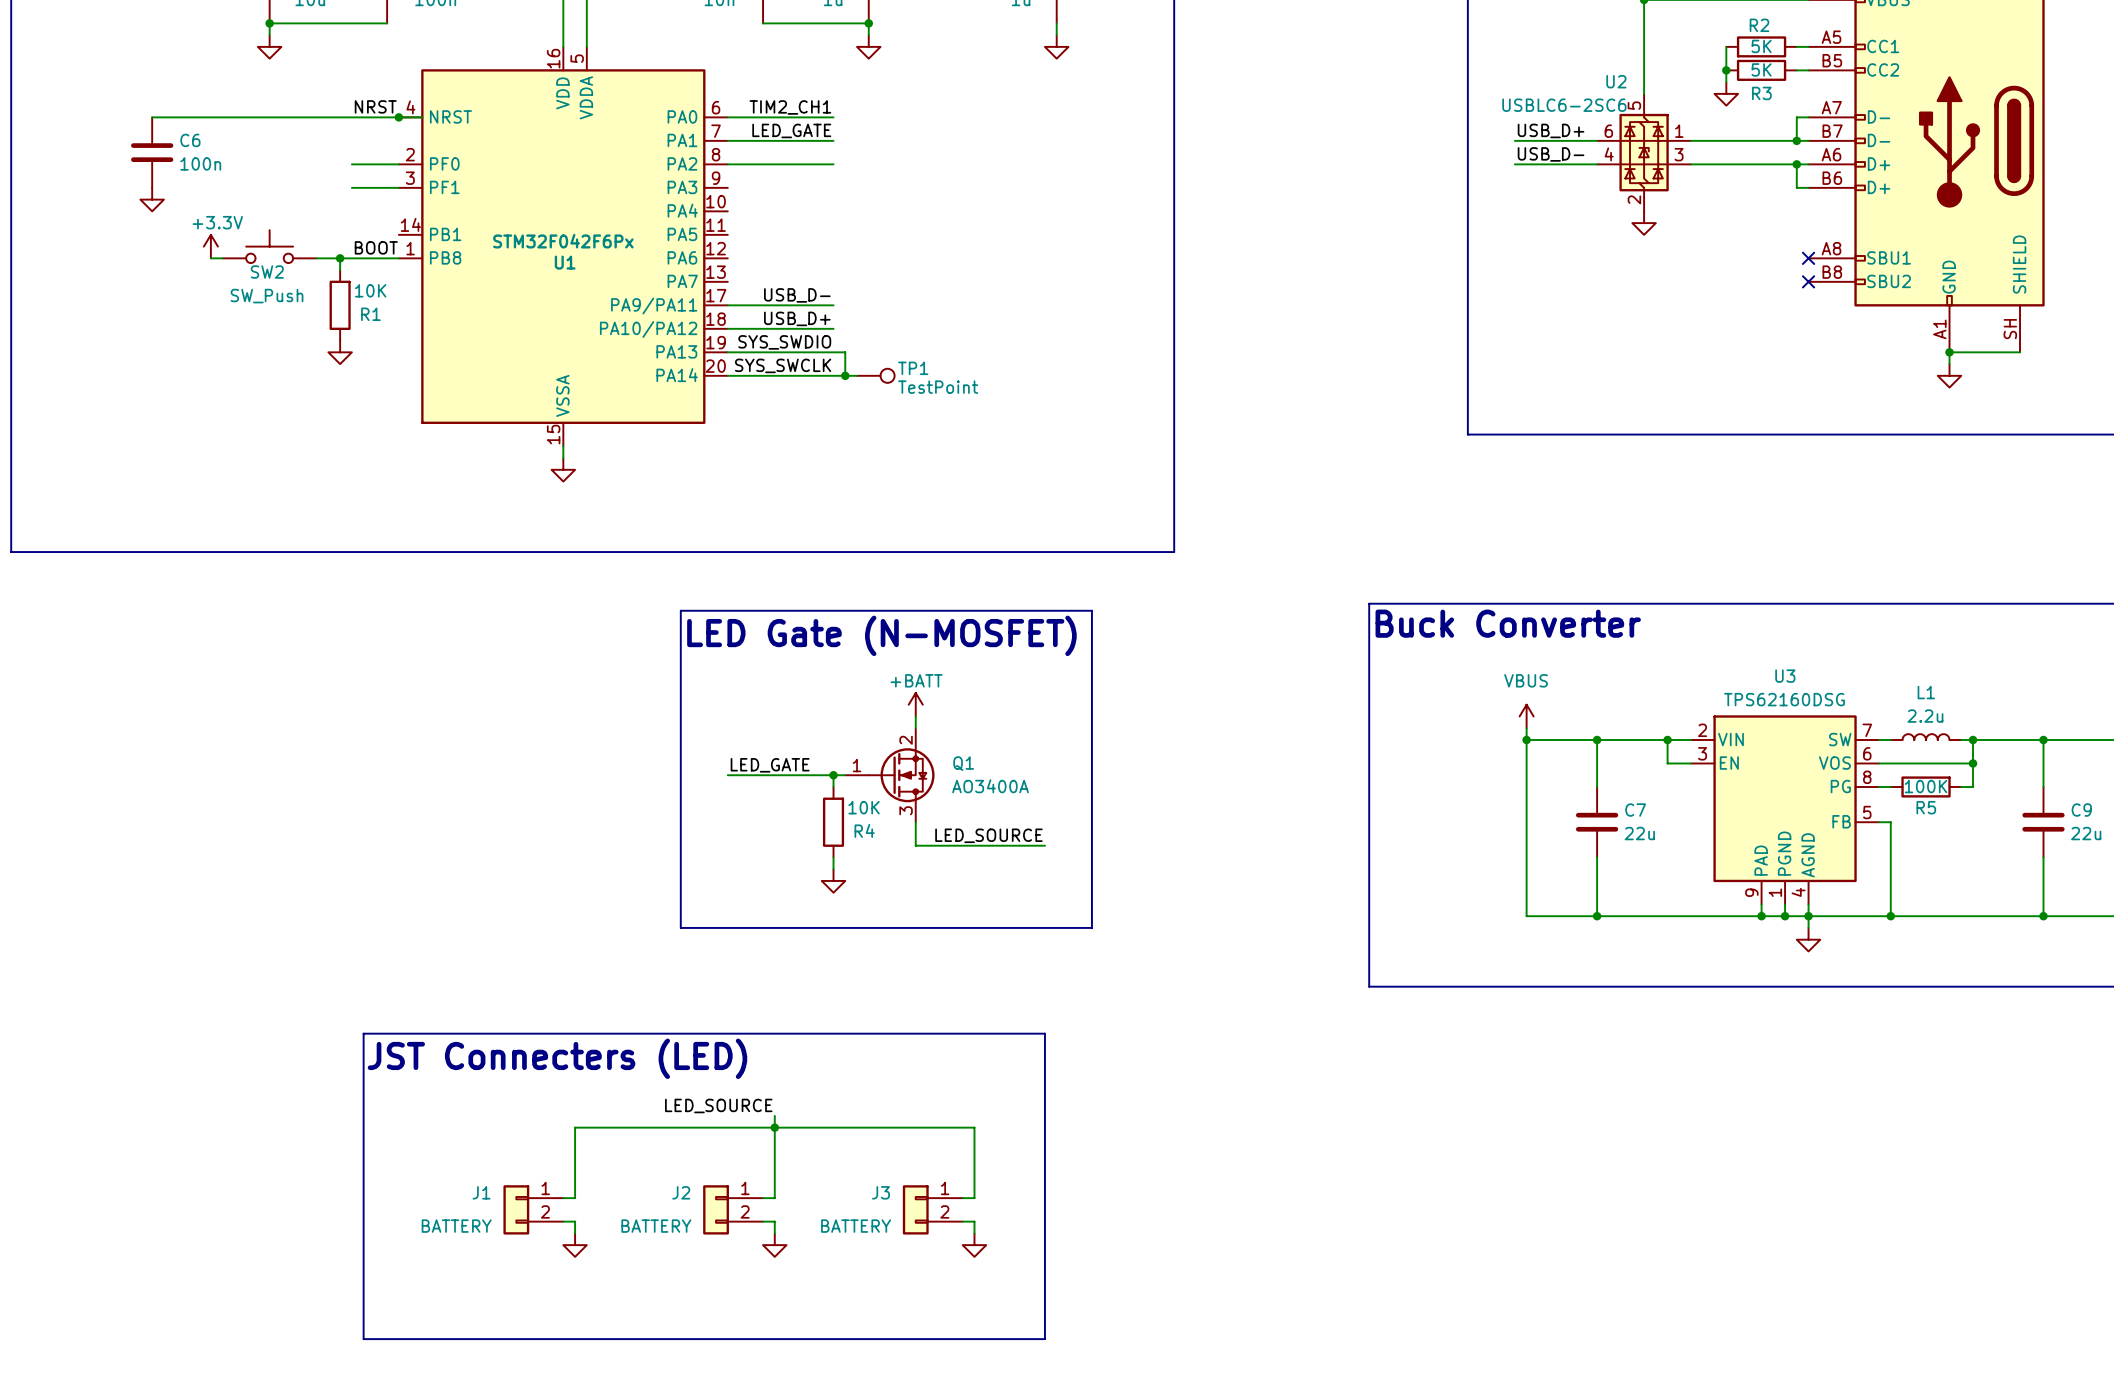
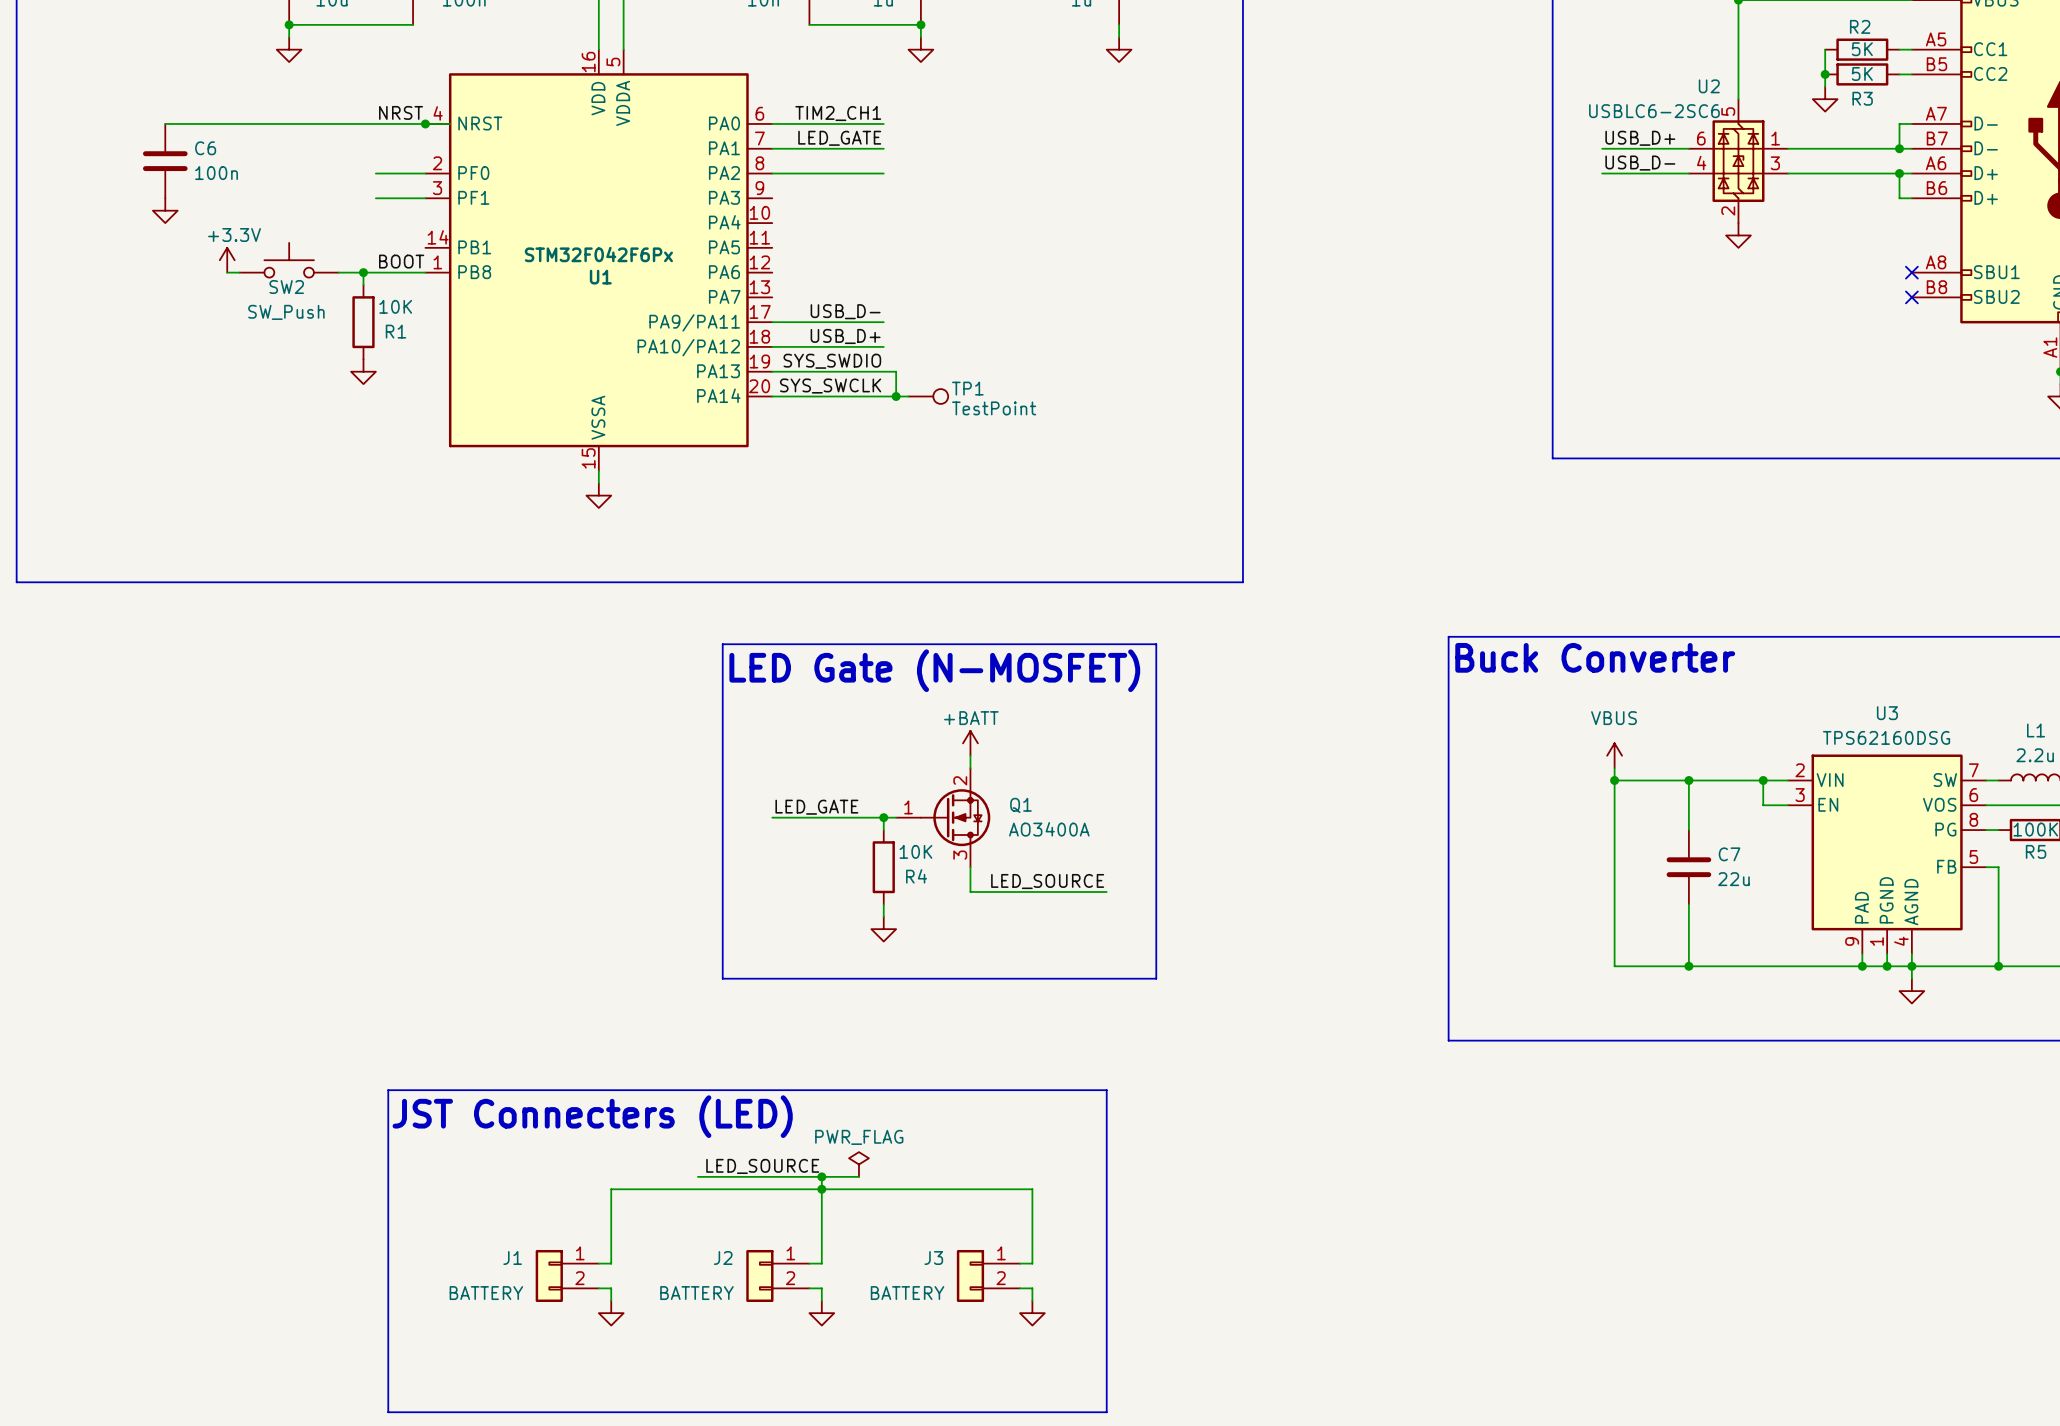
power symbol: none -> PWR_FLAG (858, 1164)
wire: none -> (697, 1176) (858, 1176)
junction: none -> (821, 1176)

